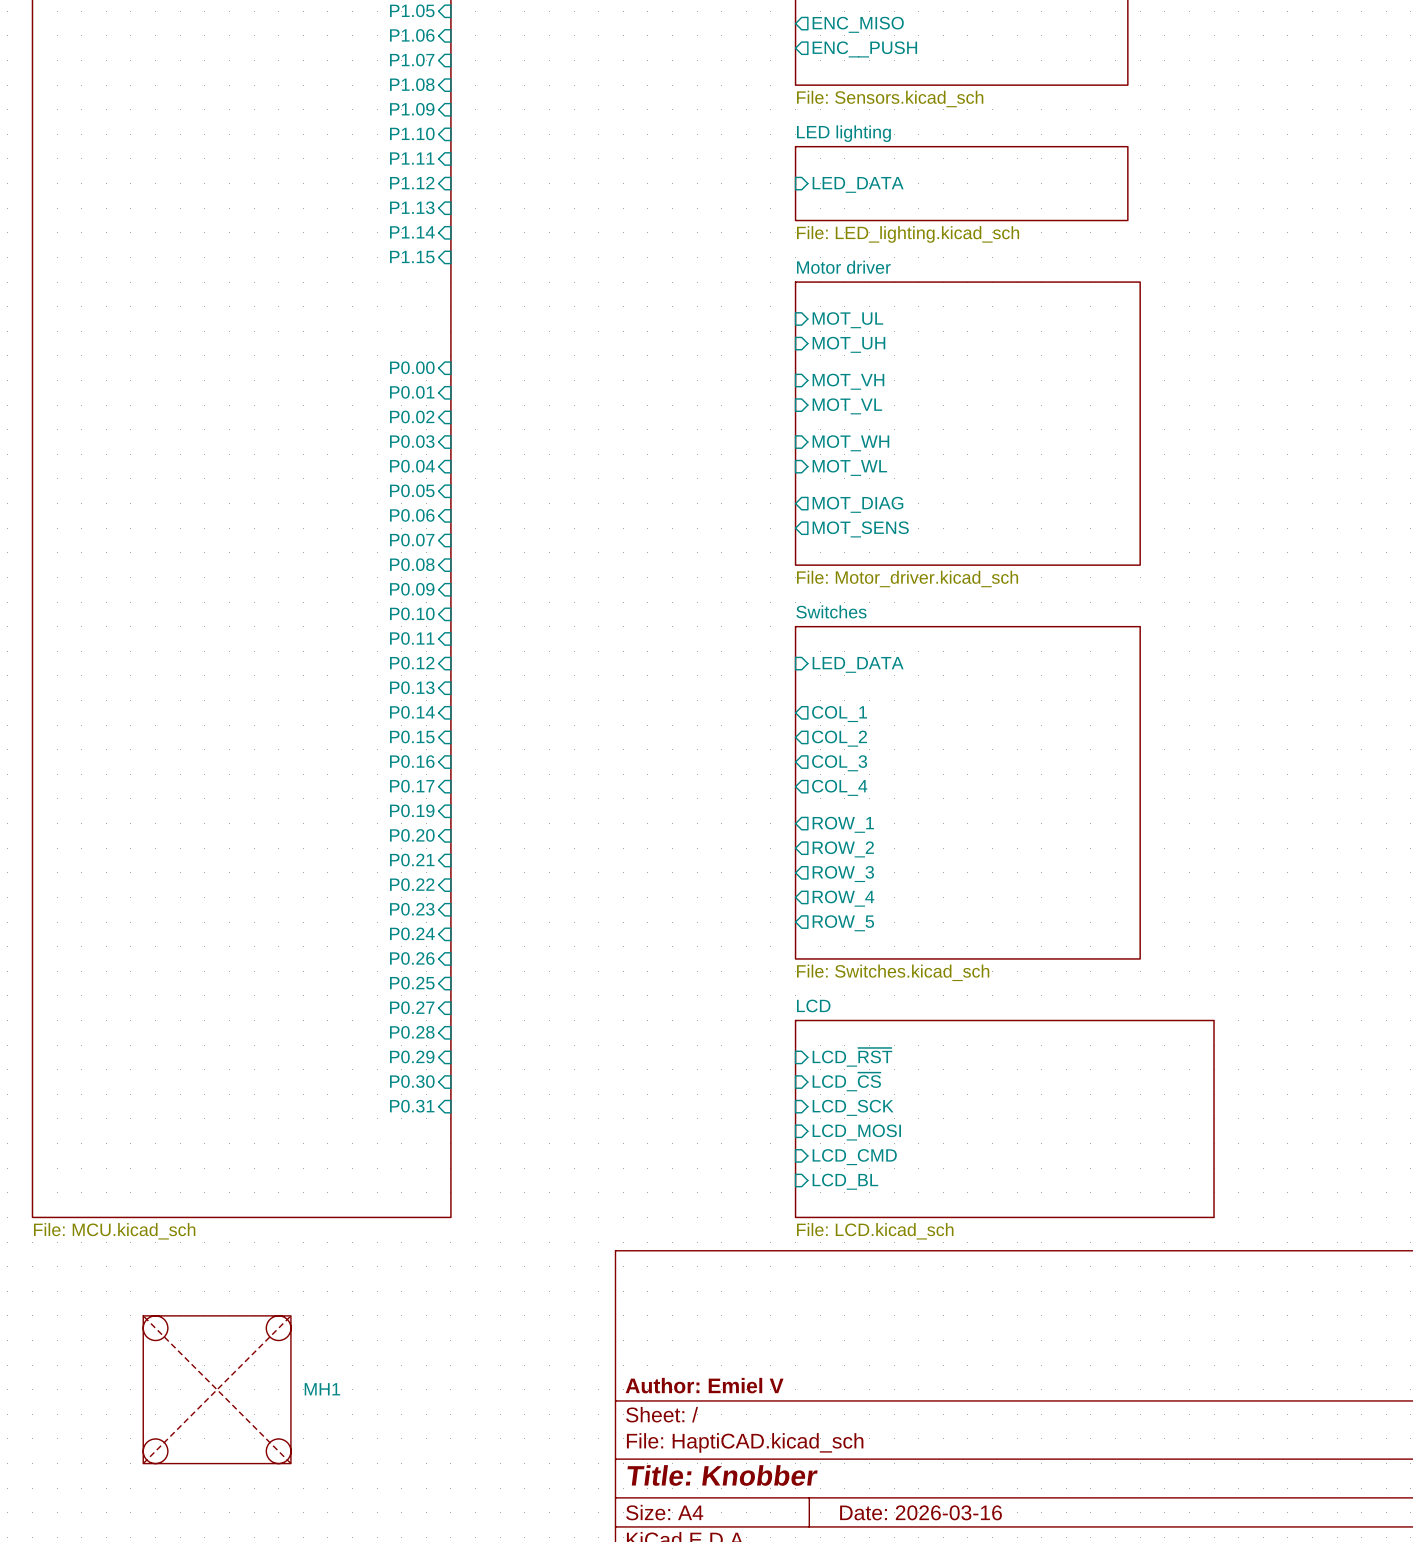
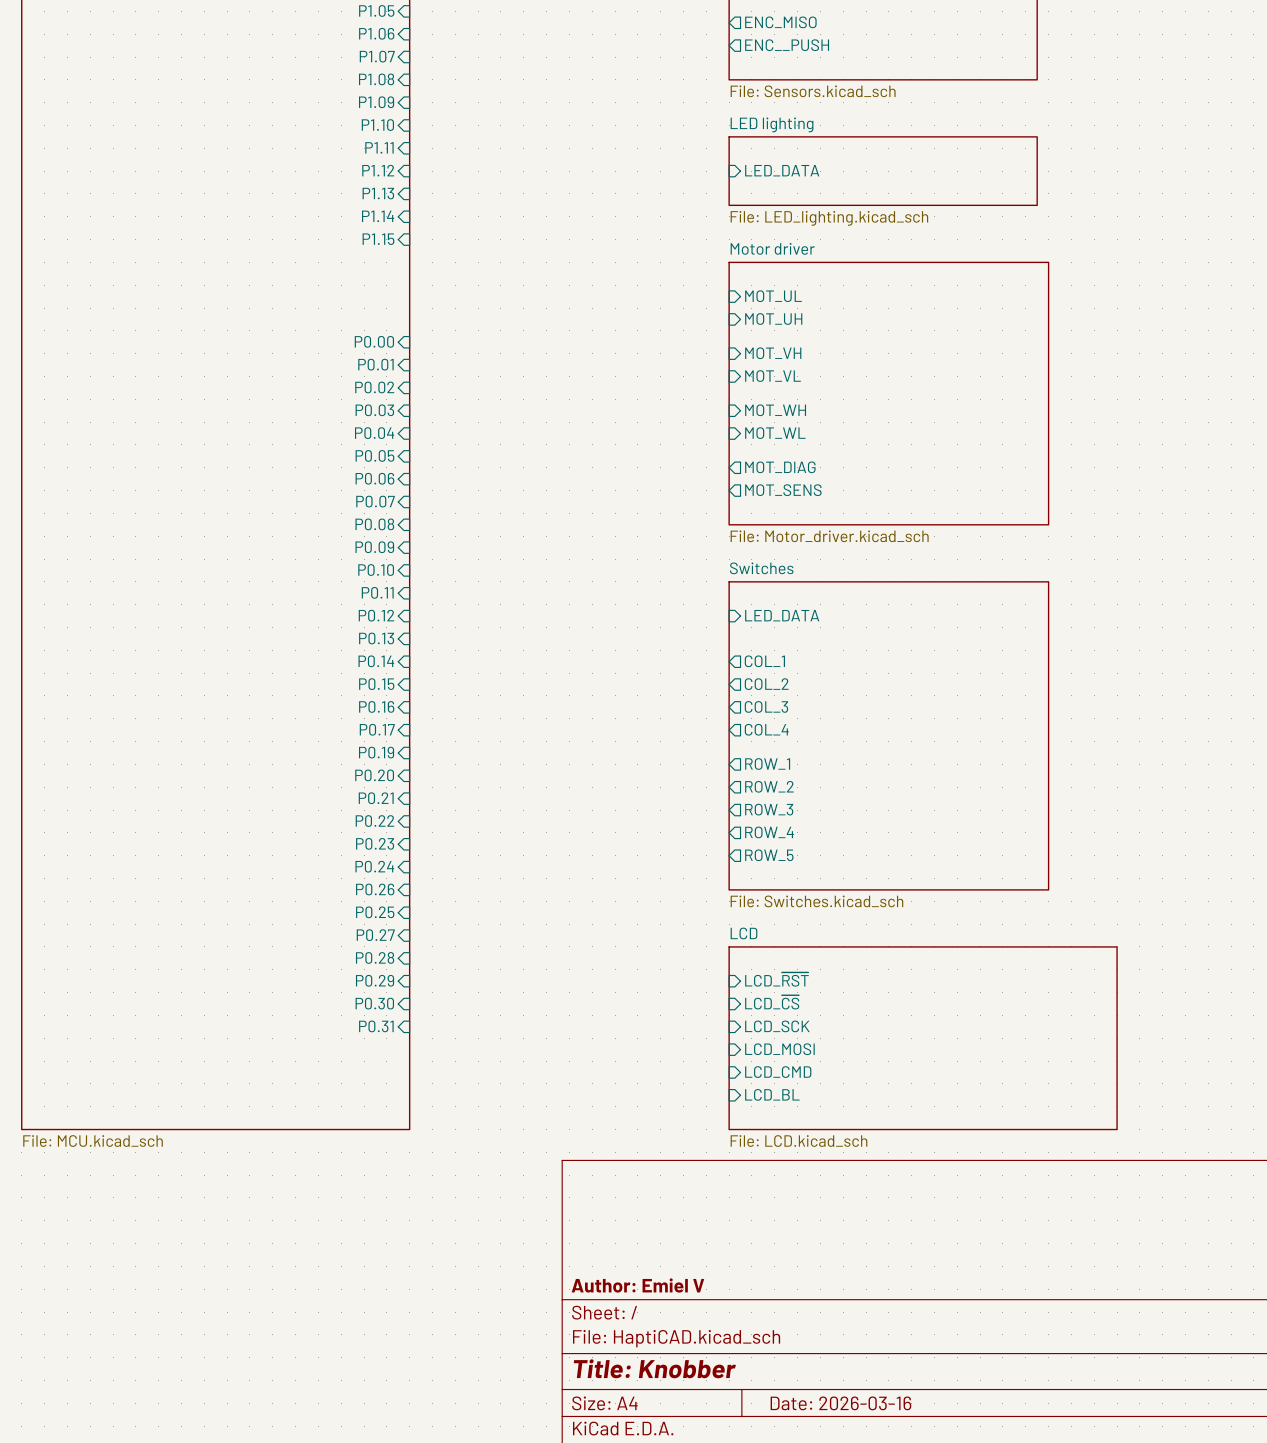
MH1: (217, 1389) -> none

